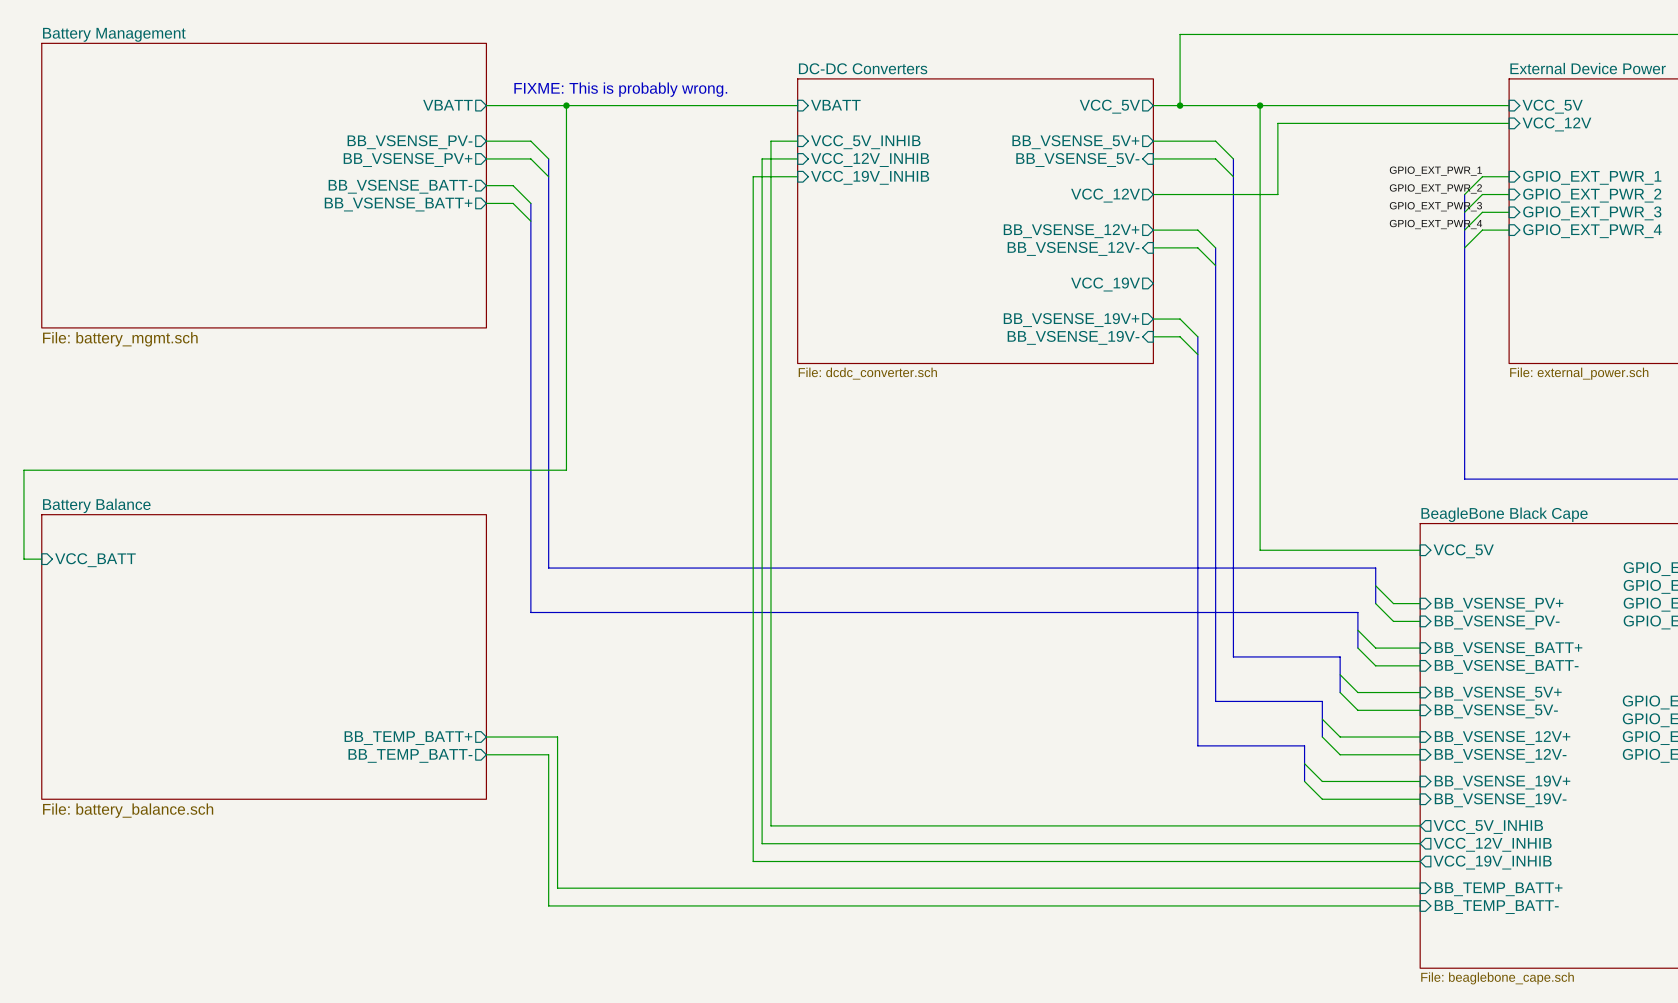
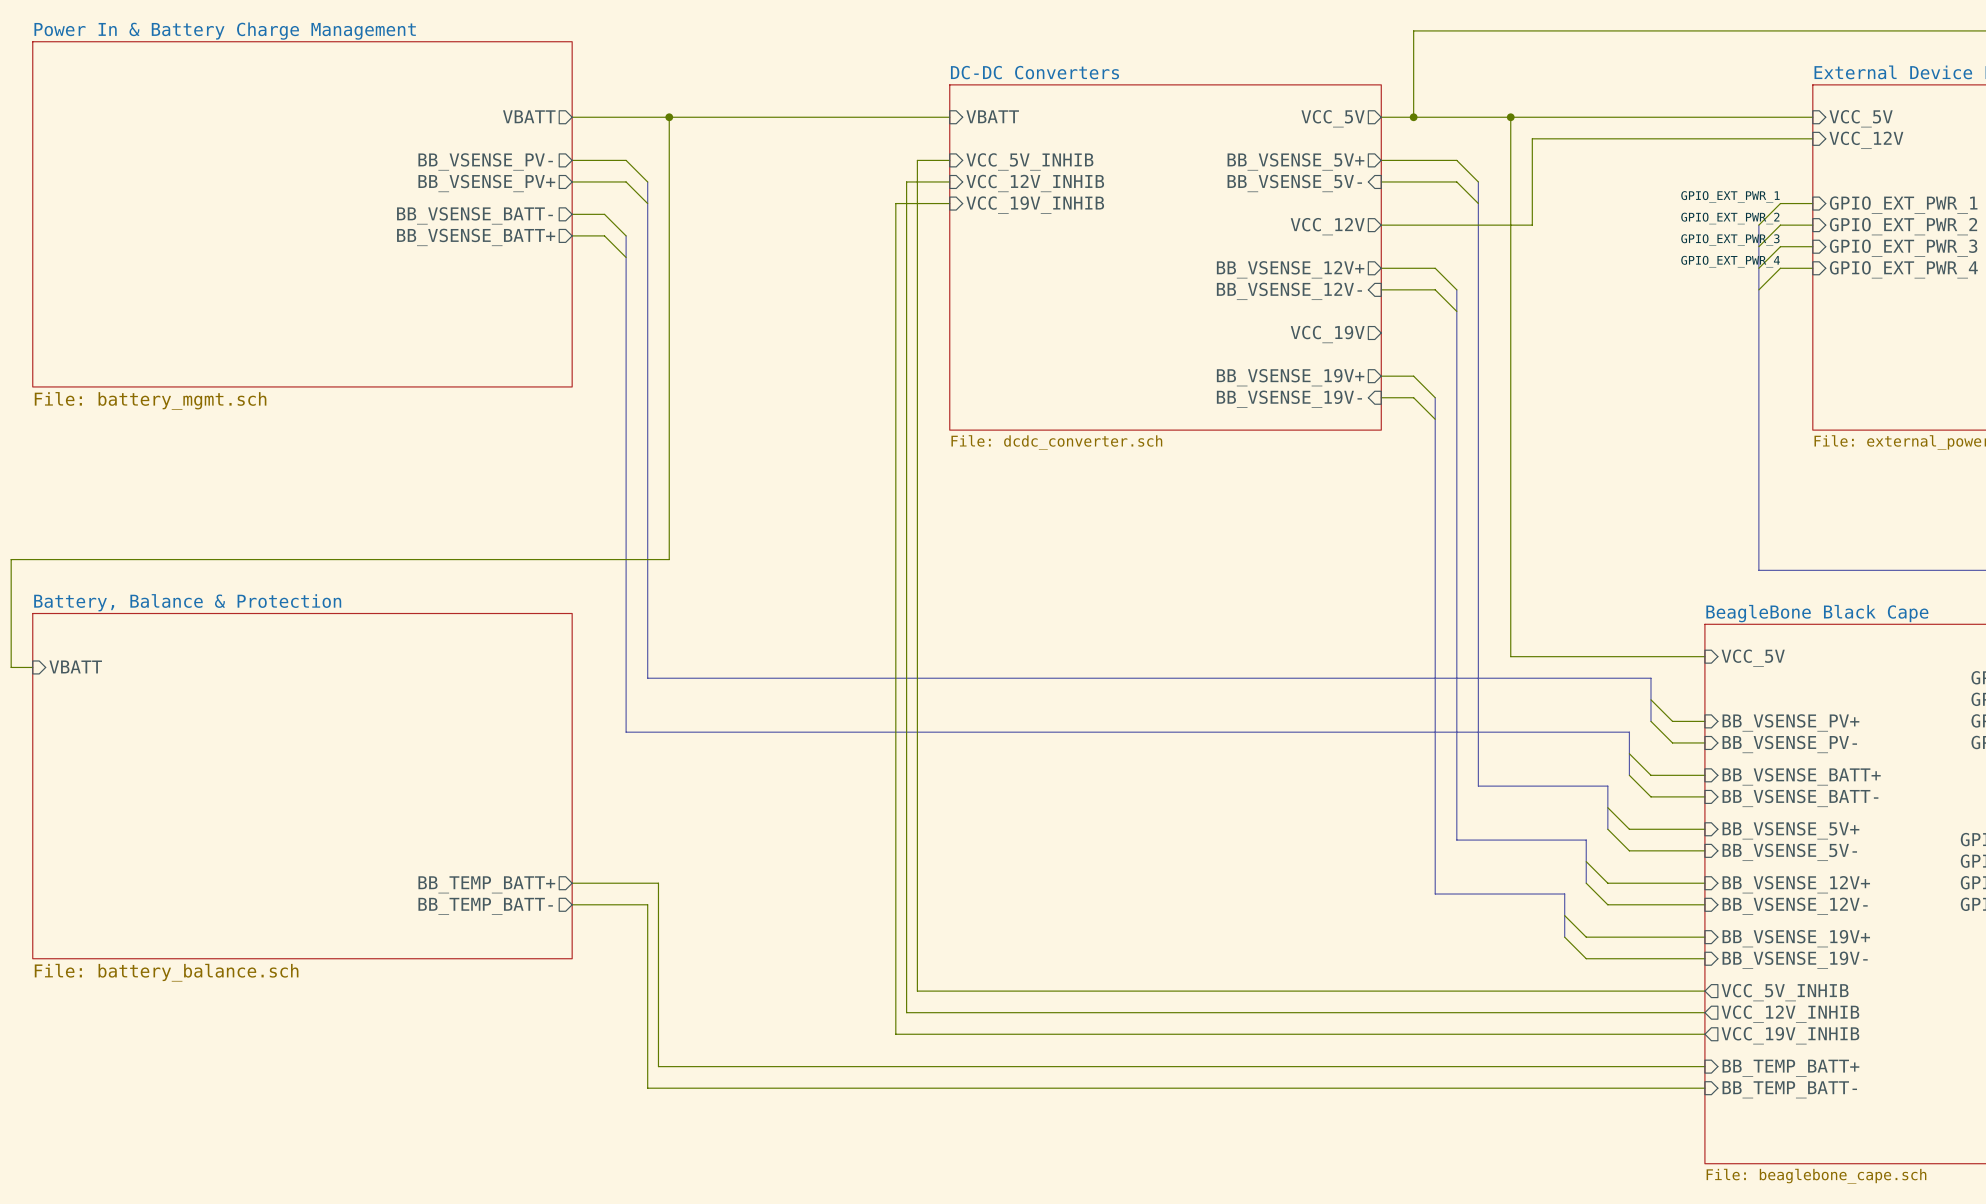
sheet Battery Management name: Battery Management (114, 34) -> Power In & Battery Charge Management (225, 31)
text: FIXME: This is probably wrong. (620, 89) -> none
sheet Battery Balance name: Battery Balance (96, 505) -> Battery, Balance & Protection (187, 602)
sheet pin: VCC_BATT (95, 560) -> VBATT (75, 666)

